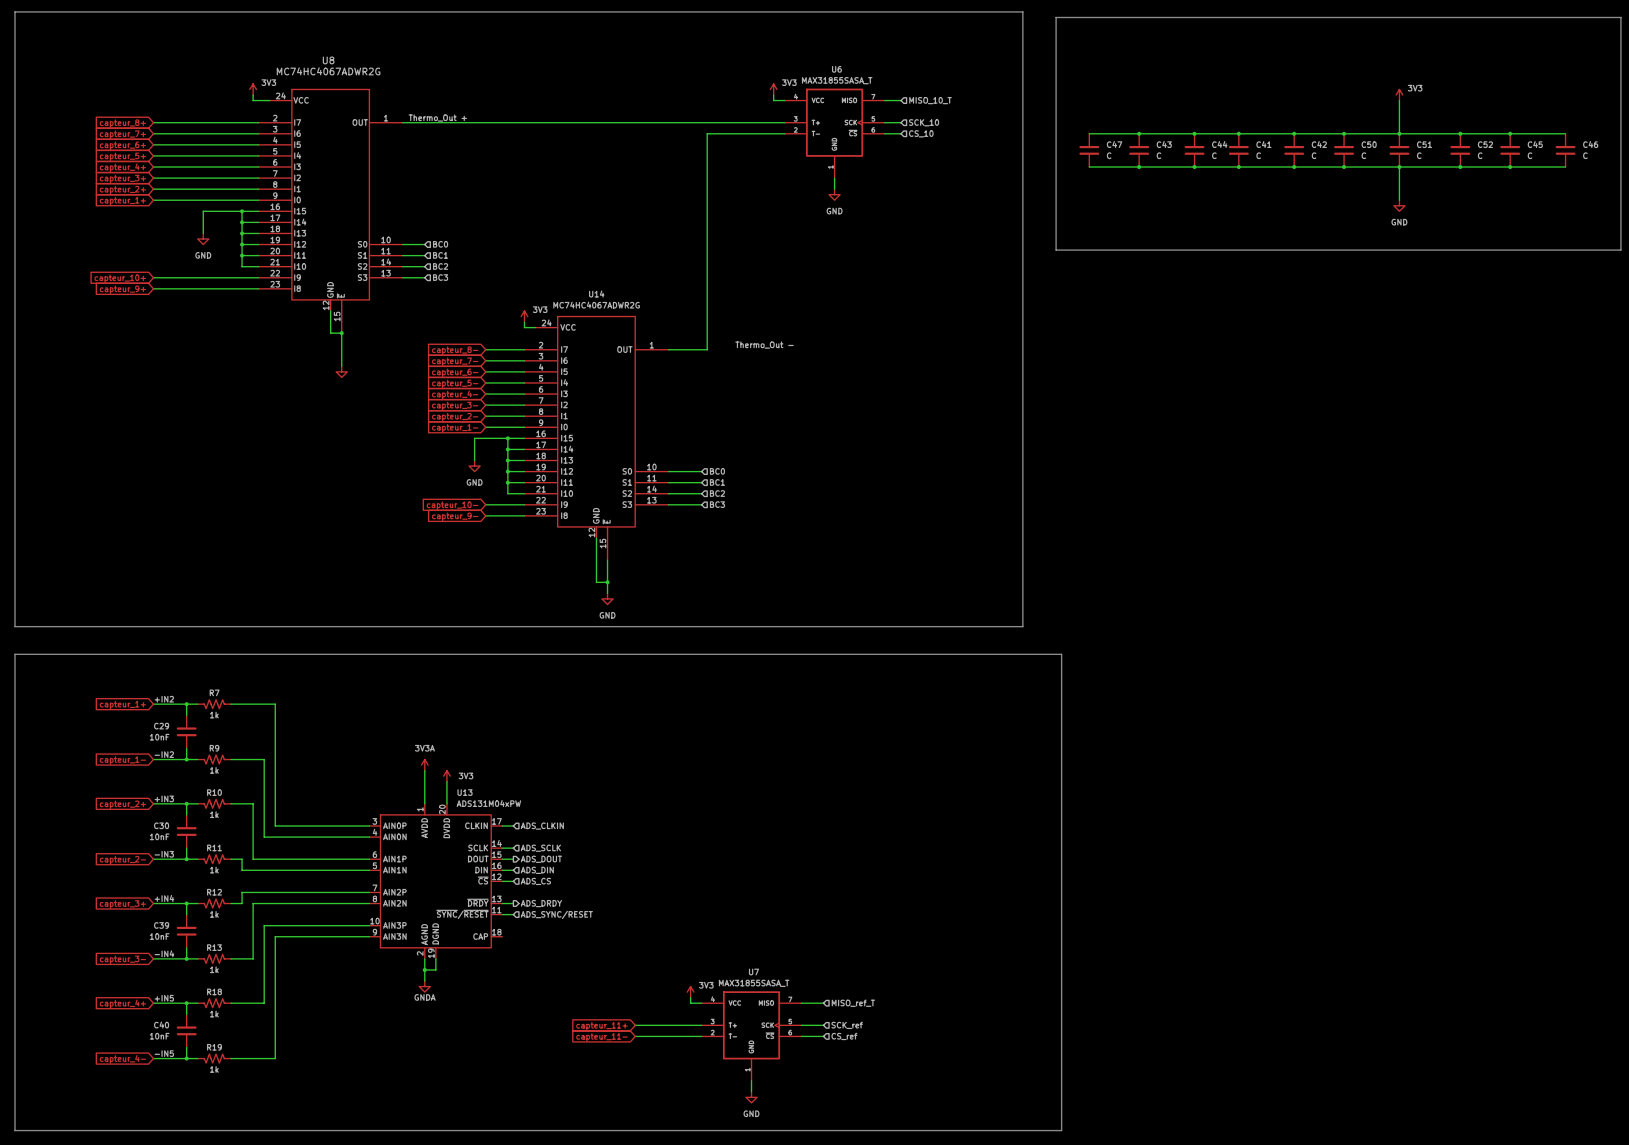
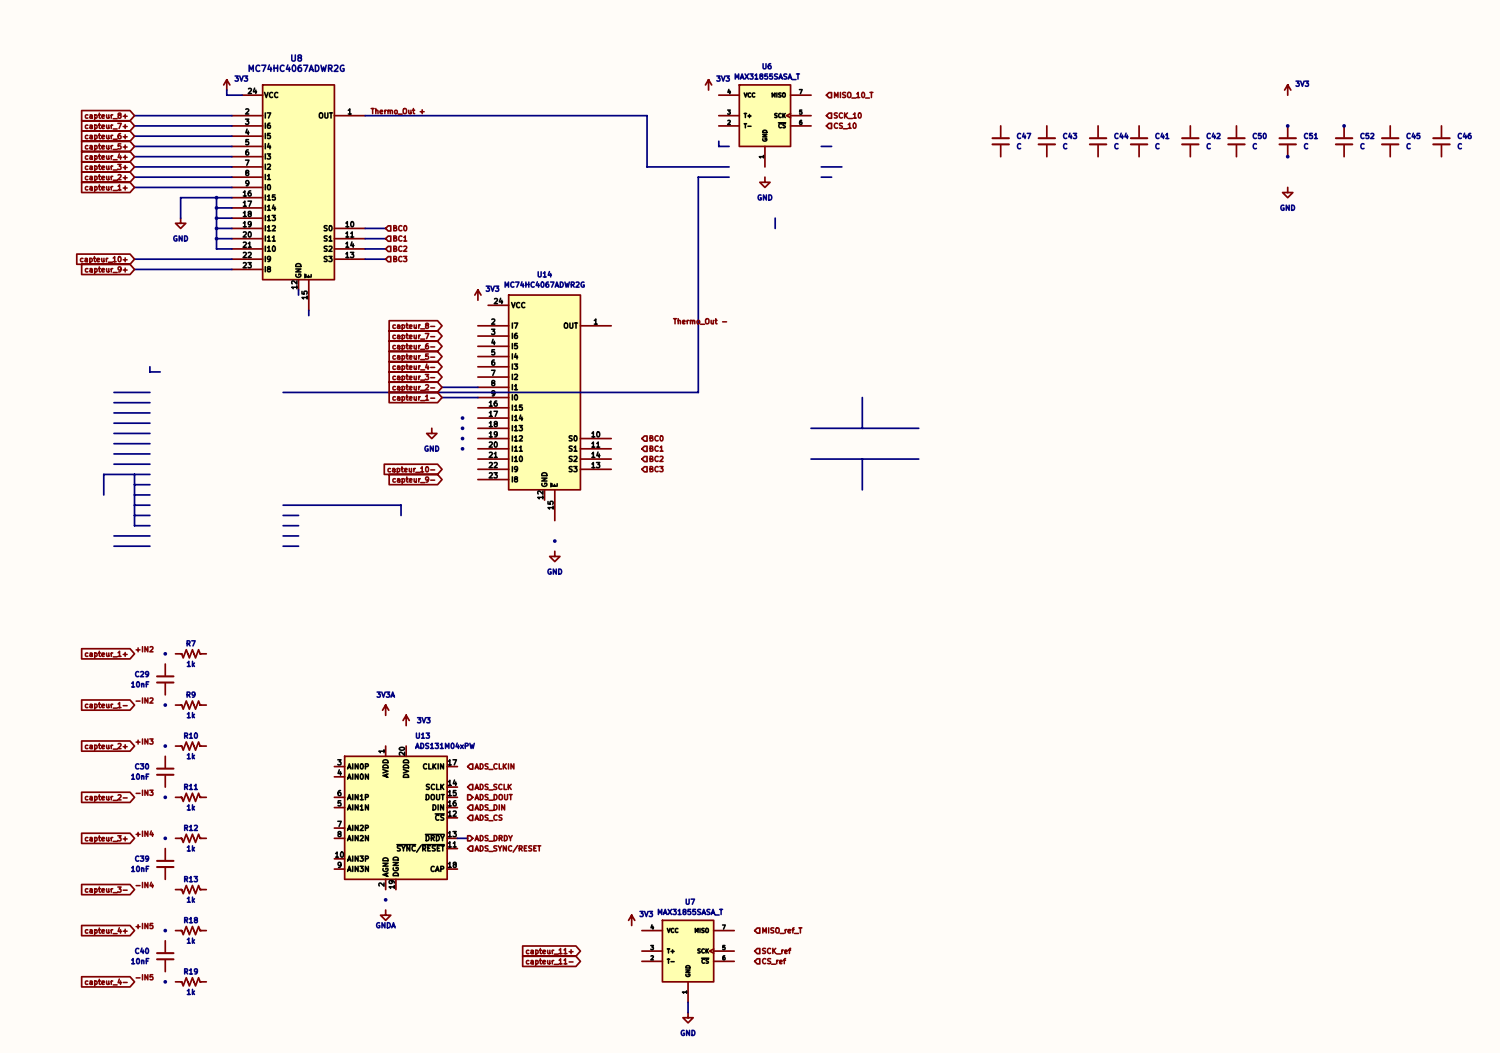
line: (15, 11) (1022, 11) (1022, 626) (15, 626) (15, 11) -> none
line: (1056, 17) (1620, 17) (1620, 250) (1056, 250) (1056, 17) -> none
wire: (773, 95) (773, 100) (784, 100) -> (718, 141) (718, 146) (729, 146)
wire: (884, 100) (901, 100) -> none
wire: (1399, 100) (1399, 133) -> none
wire: (707, 122) (784, 122) -> (647, 115) (647, 125)
wire: (884, 122) (901, 122) -> none
wire: (707, 133) (784, 133) -> none
wire: (884, 133) (901, 133) -> none
wire: (1089, 133) (1565, 133) -> none
junction: (1139, 133) -> none
junction: (1194, 133) -> none
junction: (1238, 133) -> none
junction: (1294, 133) -> none
junction: (1344, 133) -> none
junction: (1510, 133) -> none
wire: none -> (821, 146) (831, 146)
wire: (1089, 167) (1565, 167) -> none
junction: (1139, 167) -> none
junction: (1194, 167) -> none
junction: (1238, 167) -> none
junction: (1294, 167) -> none
junction: (1344, 167) -> none
wire: (1399, 167) (1399, 200) -> none
junction: (1460, 167) -> none
junction: (1510, 167) -> none
wire: (707, 178) (707, 349) (668, 349) -> (647, 166) (729, 166)
wire: (834, 178) (834, 189) -> (775, 218) (775, 228)
wire: none -> (821, 166) (841, 166)
wire: none -> (729, 177) (698, 177) (698, 392) (283, 392)
wire: none -> (821, 177) (831, 177)
wire: (330, 316) (330, 333) (341, 333) -> none
wire: (524, 322) (524, 327) (535, 327) -> none
junction: (341, 333) -> none
wire: (341, 338) (341, 366) -> none
wire: (485, 349) (524, 349) -> none
wire: (485, 360) (524, 360) -> none
power symbol: (341, 371) -> none
wire: (485, 371) (524, 371) -> none
wire: (485, 382) (524, 382) -> none
wire: none -> (149, 366) (149, 371) (160, 371)
wire: (485, 394) (524, 394) -> none
wire: (485, 405) (524, 405) -> none
wire: none -> (114, 392) (149, 392)
wire: none -> (862, 397) (862, 428)
wire: none -> (114, 402) (149, 402)
wire: (507, 438) (507, 493) (524, 493) -> none
junction: (507, 438) -> none
wire: (524, 438) (474, 438) (474, 460) -> none
wire: none -> (114, 412) (149, 412)
wire: (507, 449) (524, 449) -> none
wire: none -> (114, 423) (149, 423)
wire: (507, 460) (524, 460) -> none
wire: none -> (811, 428) (918, 428)
wire: none -> (114, 433) (149, 433)
wire: (507, 471) (524, 471) -> none
wire: (668, 471) (701, 471) -> none
wire: none -> (114, 443) (149, 443)
wire: (507, 482) (524, 482) -> none
wire: (668, 482) (701, 482) -> none
wire: none -> (114, 453) (149, 453)
wire: (668, 493) (701, 493) -> none
wire: none -> (811, 459) (918, 459)
wire: none -> (862, 459) (862, 489)
wire: none -> (114, 464) (149, 464)
wire: (485, 504) (524, 504) -> none
wire: (668, 504) (701, 504) -> none
wire: none -> (134, 474) (134, 525) (149, 525)
wire: none -> (149, 474) (103, 474) (103, 494)
wire: (485, 515) (524, 515) -> none
wire: none -> (134, 484) (149, 484)
wire: none -> (134, 494) (149, 494)
wire: (596, 538) (596, 582) (607, 582) -> none
wire: none -> (134, 505) (149, 505)
wire: none -> (283, 505) (401, 505) (401, 515)
wire: none -> (134, 515) (149, 515)
wire: none -> (283, 515) (298, 515)
wire: (607, 560) (607, 593) -> none
wire: none -> (283, 525) (298, 525)
wire: none -> (114, 535) (149, 535)
wire: none -> (283, 535) (298, 535)
wire: none -> (114, 546) (149, 546)
wire: none -> (283, 546) (298, 546)
line: (15, 654) (15, 1130) (1061, 1130) (1061, 654) (15, 654) -> none
wire: (153, 704) (197, 704) -> none
wire: (186, 704) (186, 715) -> none
wire: (230, 704) (275, 704) (275, 825) (369, 825) -> none
wire: (186, 748) (186, 759) -> none
wire: (153, 759) (197, 759) -> none
wire: (230, 759) (264, 759) (264, 837) (369, 837) -> none
wire: (424, 770) (424, 803) -> none
wire: (446, 781) (446, 803) -> none
wire: (153, 803) (197, 803) -> none
wire: (186, 803) (186, 814) -> none
wire: (230, 803) (253, 803) (253, 859) (369, 859) -> none
wire: (502, 825) (513, 825) -> none
wire: (186, 848) (186, 859) -> none
wire: (502, 848) (513, 848) -> none
wire: (153, 859) (197, 859) -> none
wire: (230, 859) (242, 859) (242, 870) (369, 870) -> none
wire: (502, 859) (513, 859) -> none
wire: (502, 870) (513, 870) -> none
wire: (502, 881) (513, 881) -> none
wire: (369, 892) (242, 892) (242, 903) (230, 903) -> none
wire: (153, 903) (197, 903) -> none
wire: (186, 903) (186, 914) -> none
wire: (369, 903) (253, 903) (253, 958) (230, 958) -> none
wire: (502, 914) (513, 914) -> none
wire: (369, 925) (264, 925) (264, 1003) (230, 1003) -> none
wire: (369, 936) (275, 936) (275, 1058) (230, 1058) -> none
wire: (186, 947) (186, 958) -> none
wire: (153, 958) (197, 958) -> none
junction: (186, 958) -> none
wire: (424, 958) (424, 981) -> none
wire: (435, 958) (435, 969) (424, 969) -> none
wire: (690, 997) (690, 1003) (701, 1003) -> none
wire: (153, 1003) (197, 1003) -> none
wire: (186, 1003) (186, 1014) -> none
wire: (801, 1003) (823, 1003) -> none
wire: (635, 1025) (701, 1025) -> none
wire: (801, 1025) (823, 1025) -> none
wire: (635, 1036) (701, 1036) -> none
wire: (801, 1036) (823, 1036) -> none
wire: (186, 1047) (186, 1058) -> none
wire: (153, 1058) (197, 1058) -> none

